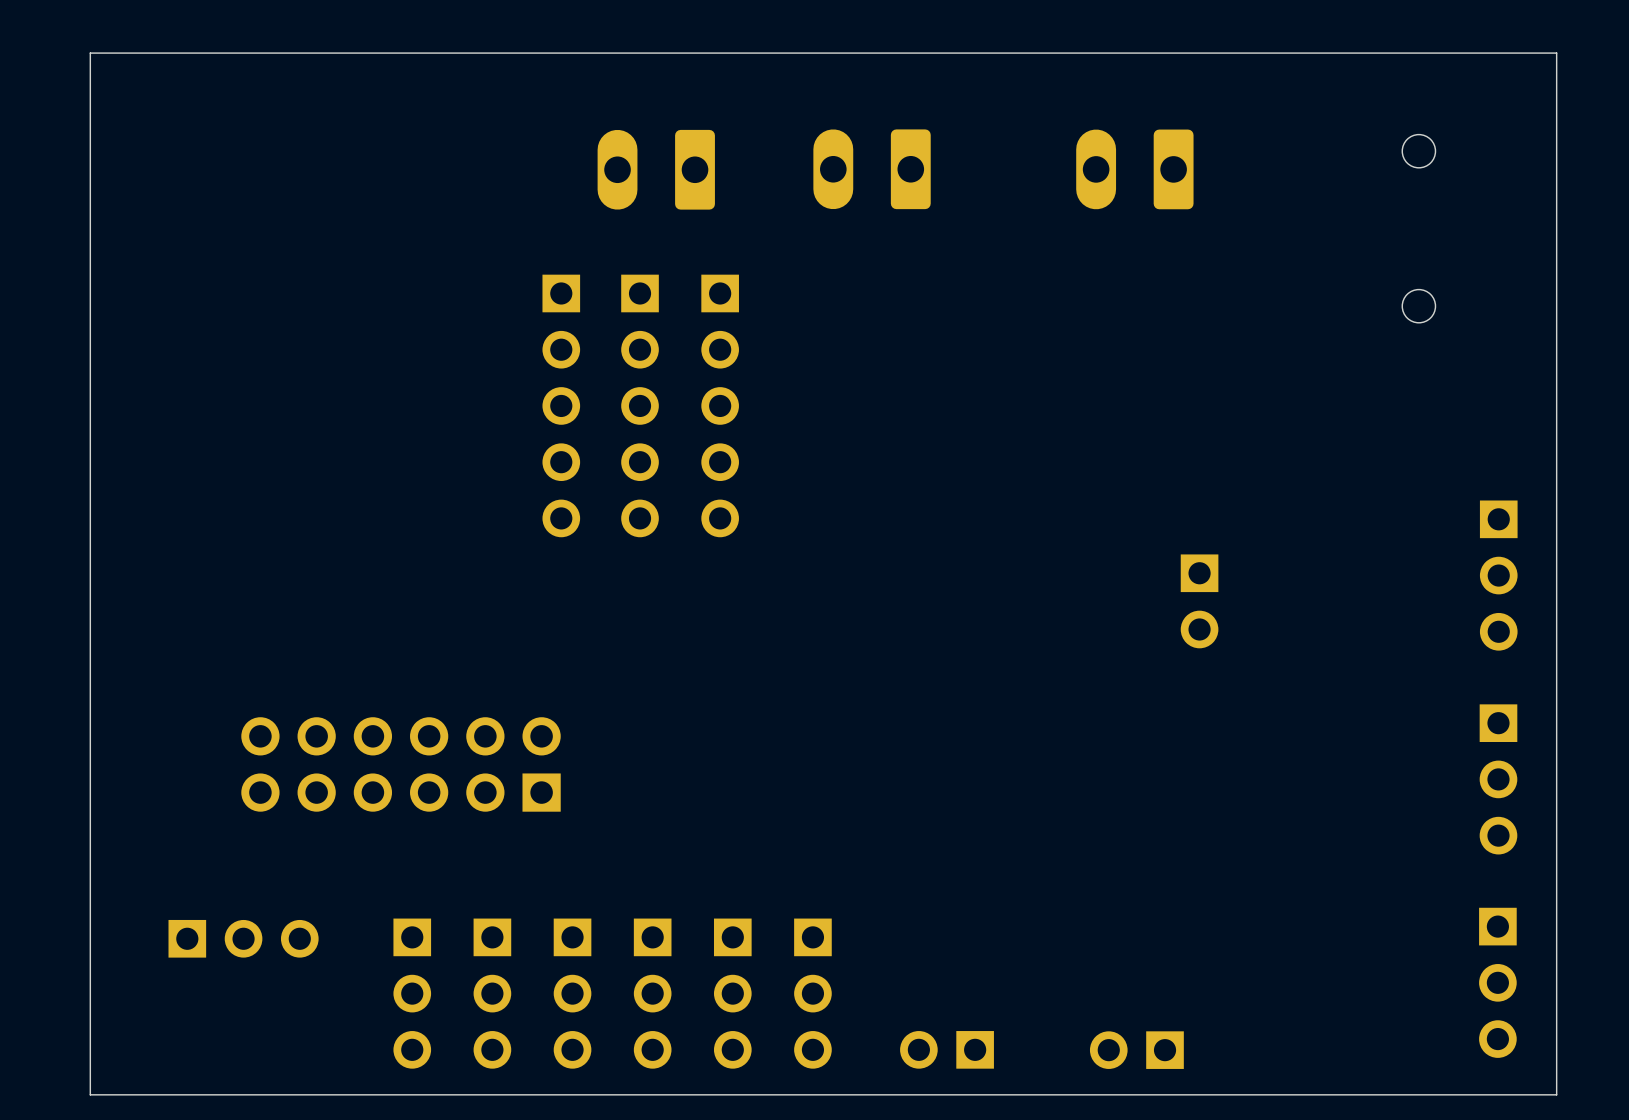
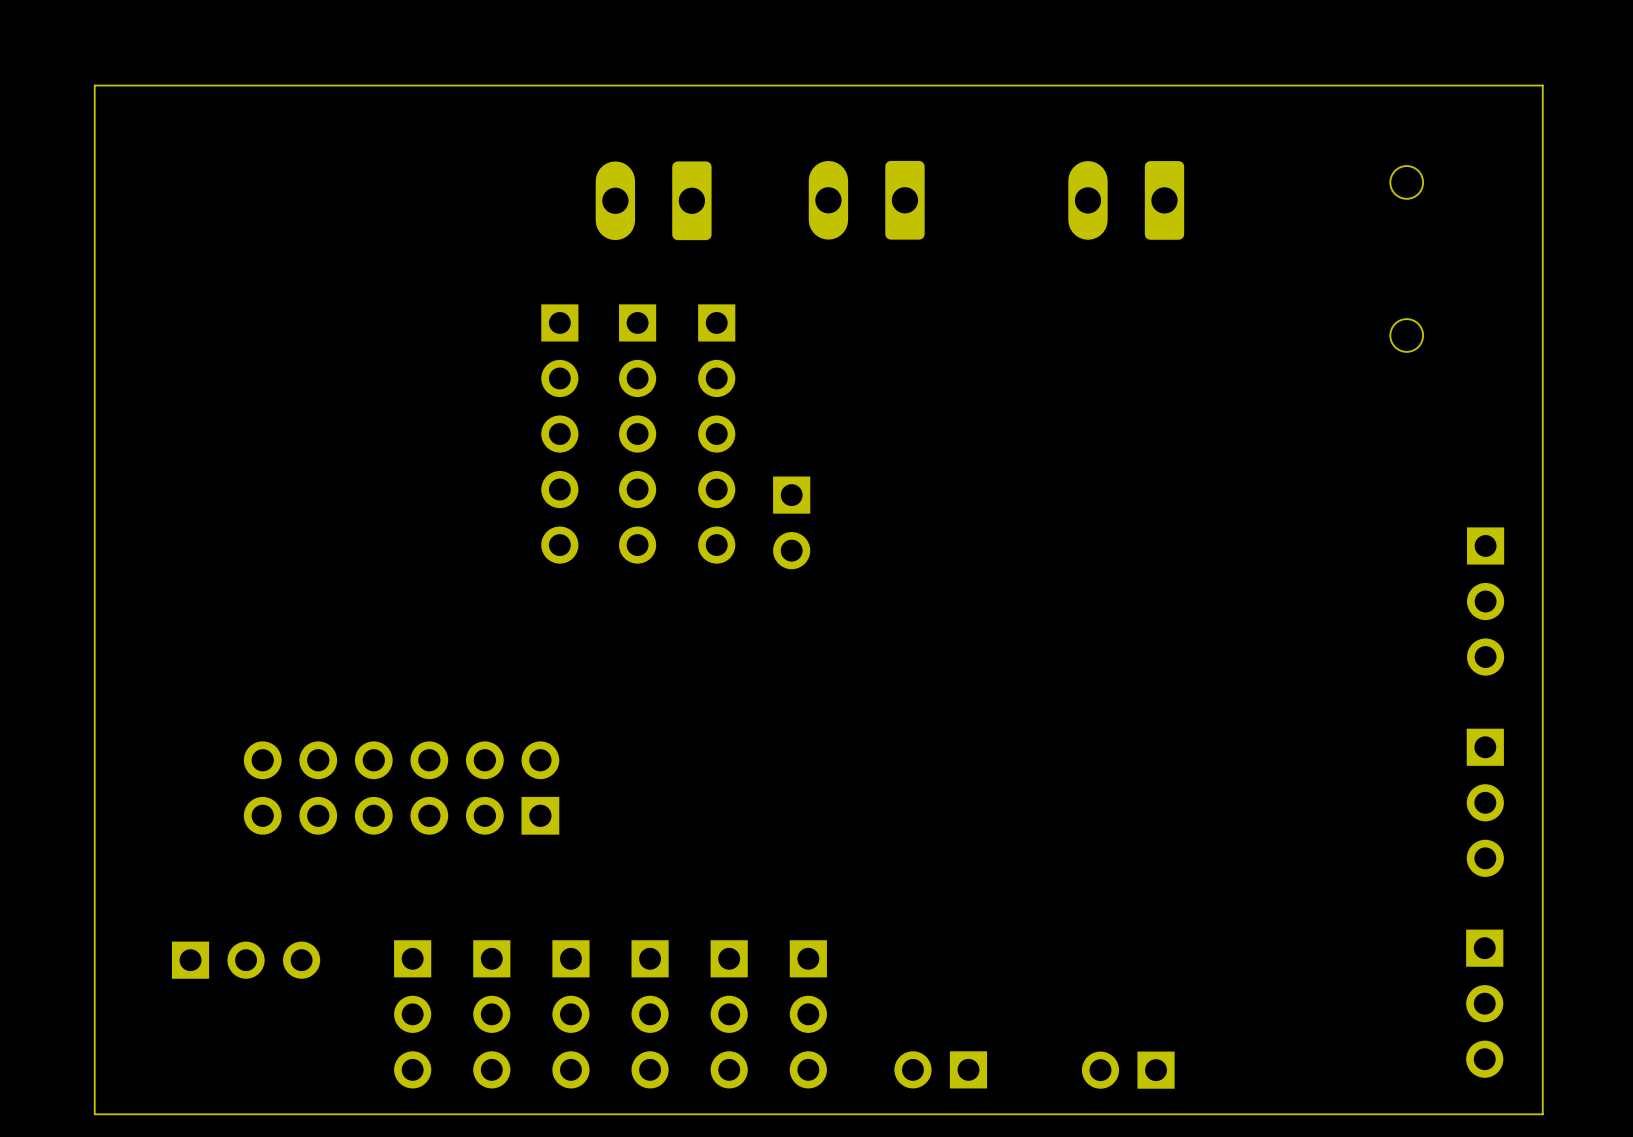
part position: (1199, 601) -> (791, 522)

